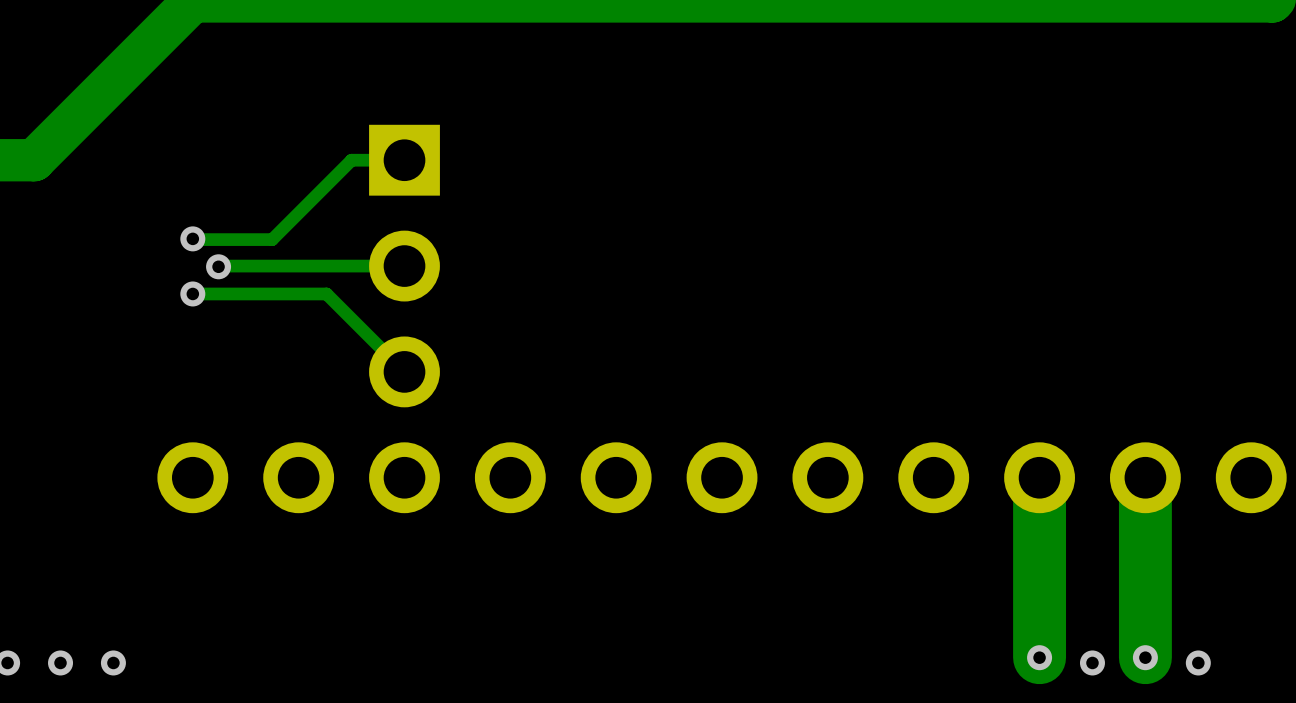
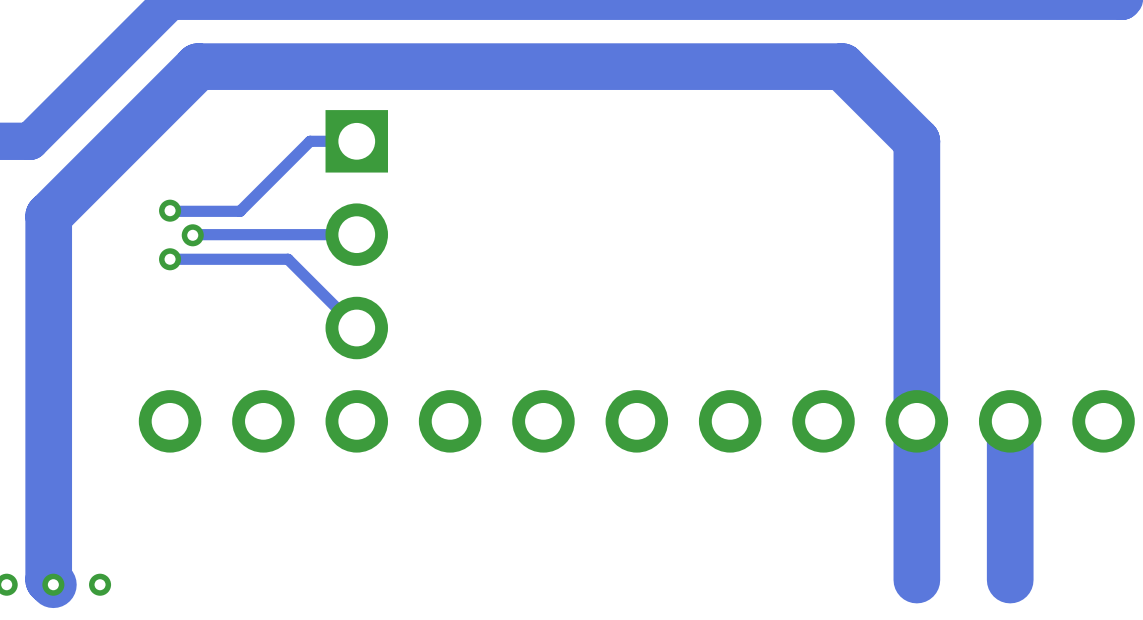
track: none -> (916, 421) (916, 141) (842, 66) (198, 66) (48, 215) (48, 580) (53, 584)
via: (1039, 657) -> none
via: (1145, 657) -> none
via: (1092, 662) -> none
via: (1198, 662) -> none

